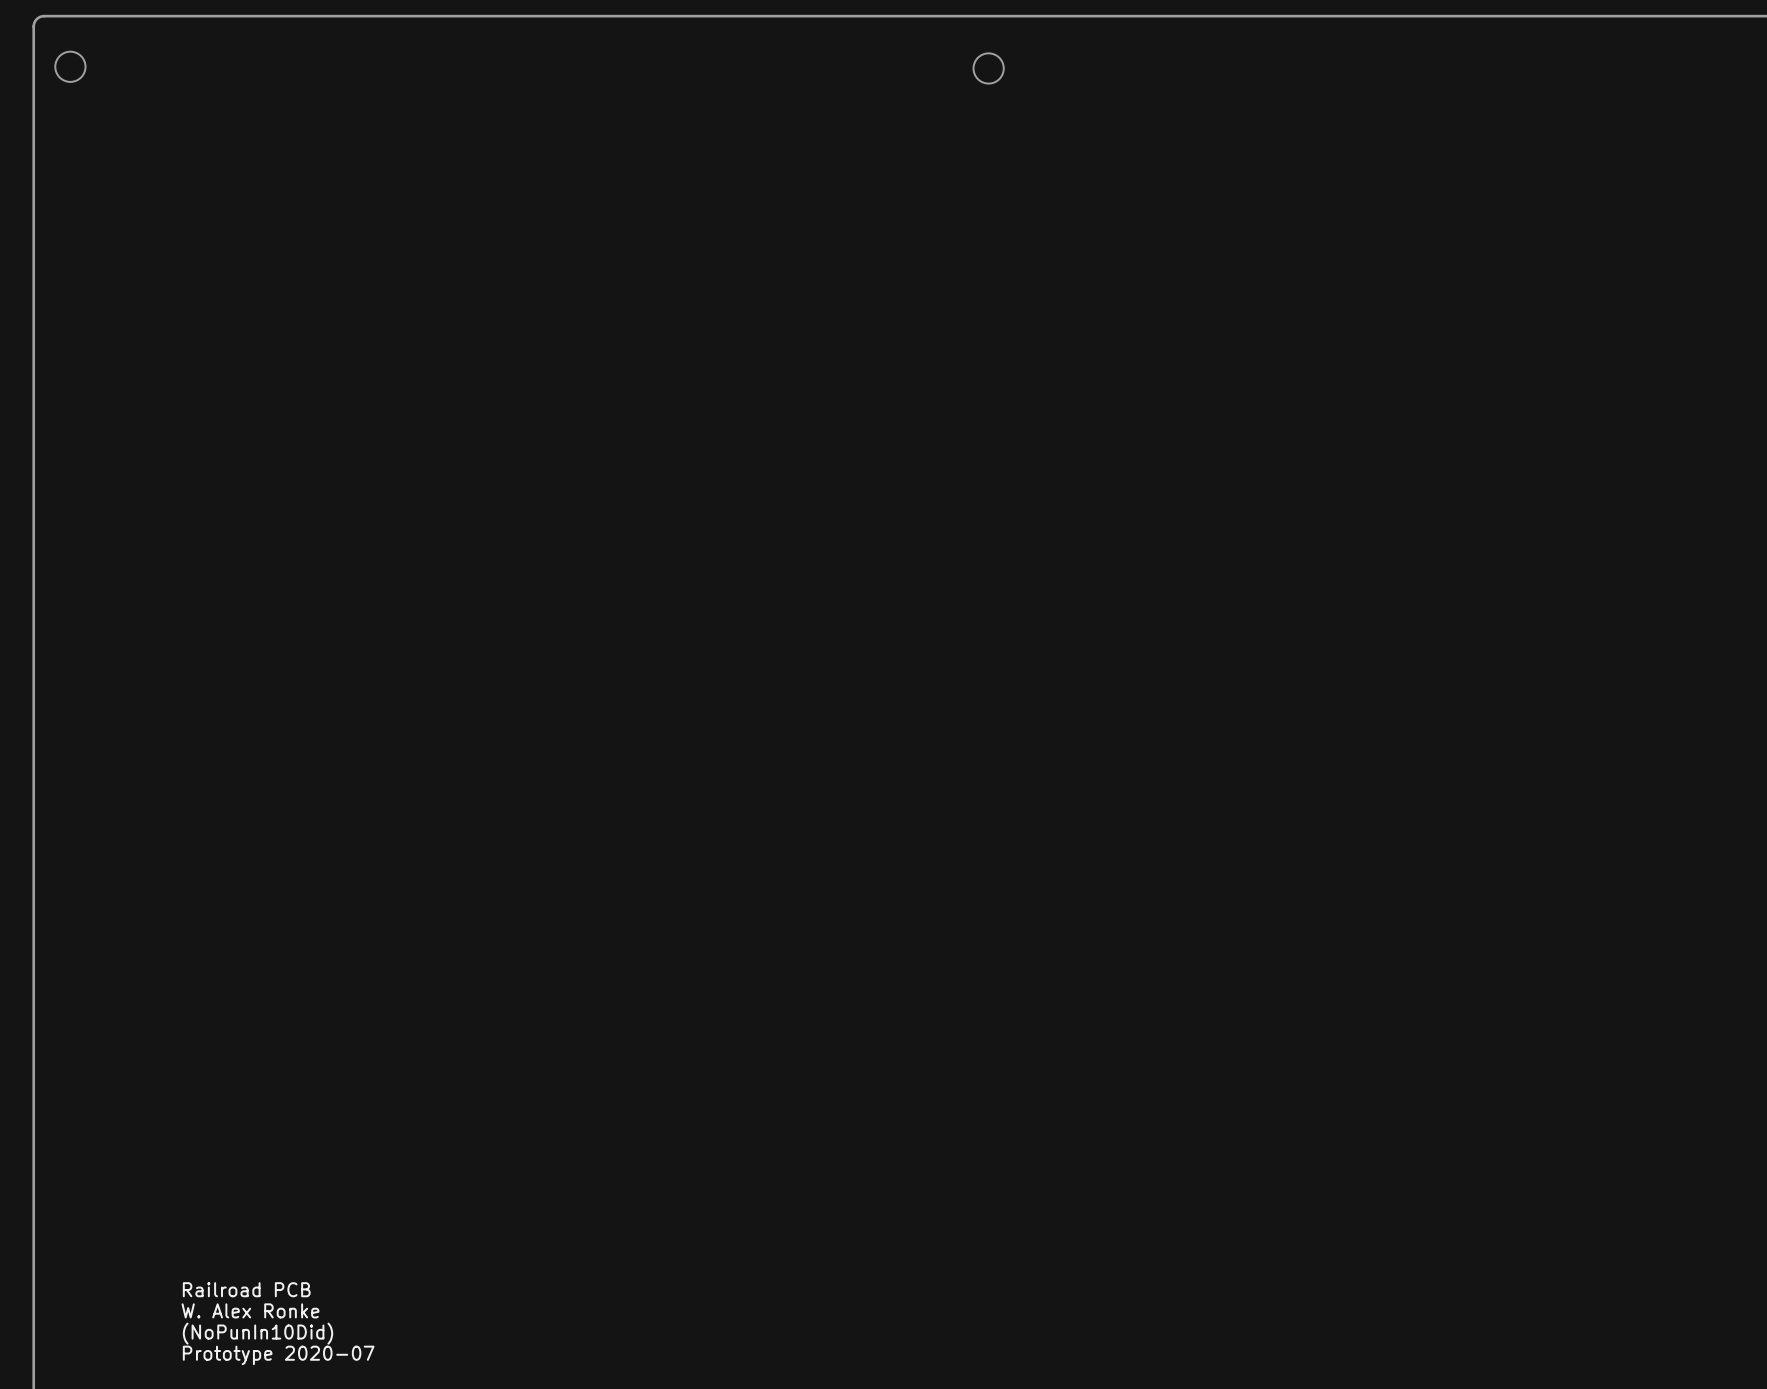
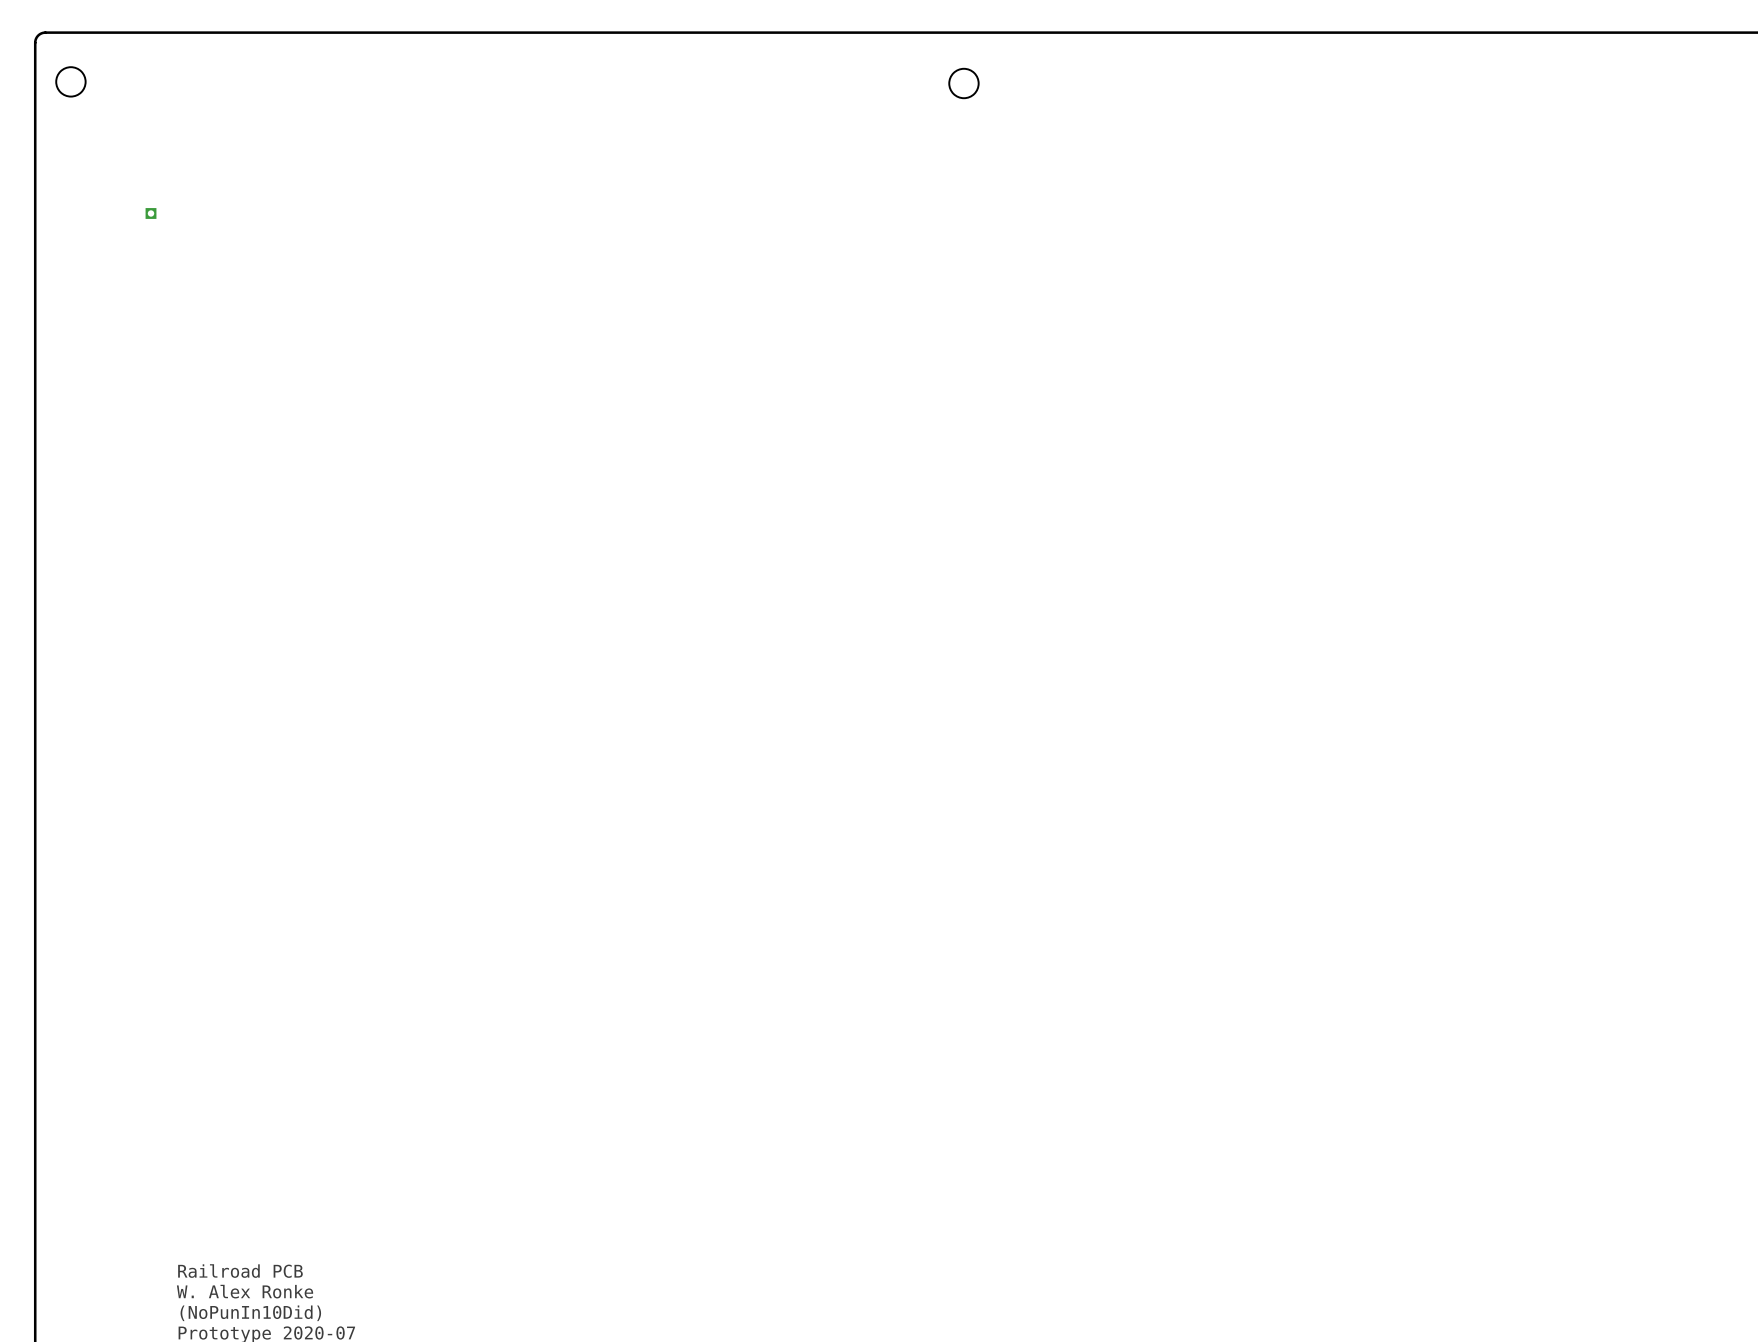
part: none -> (151, 213)

